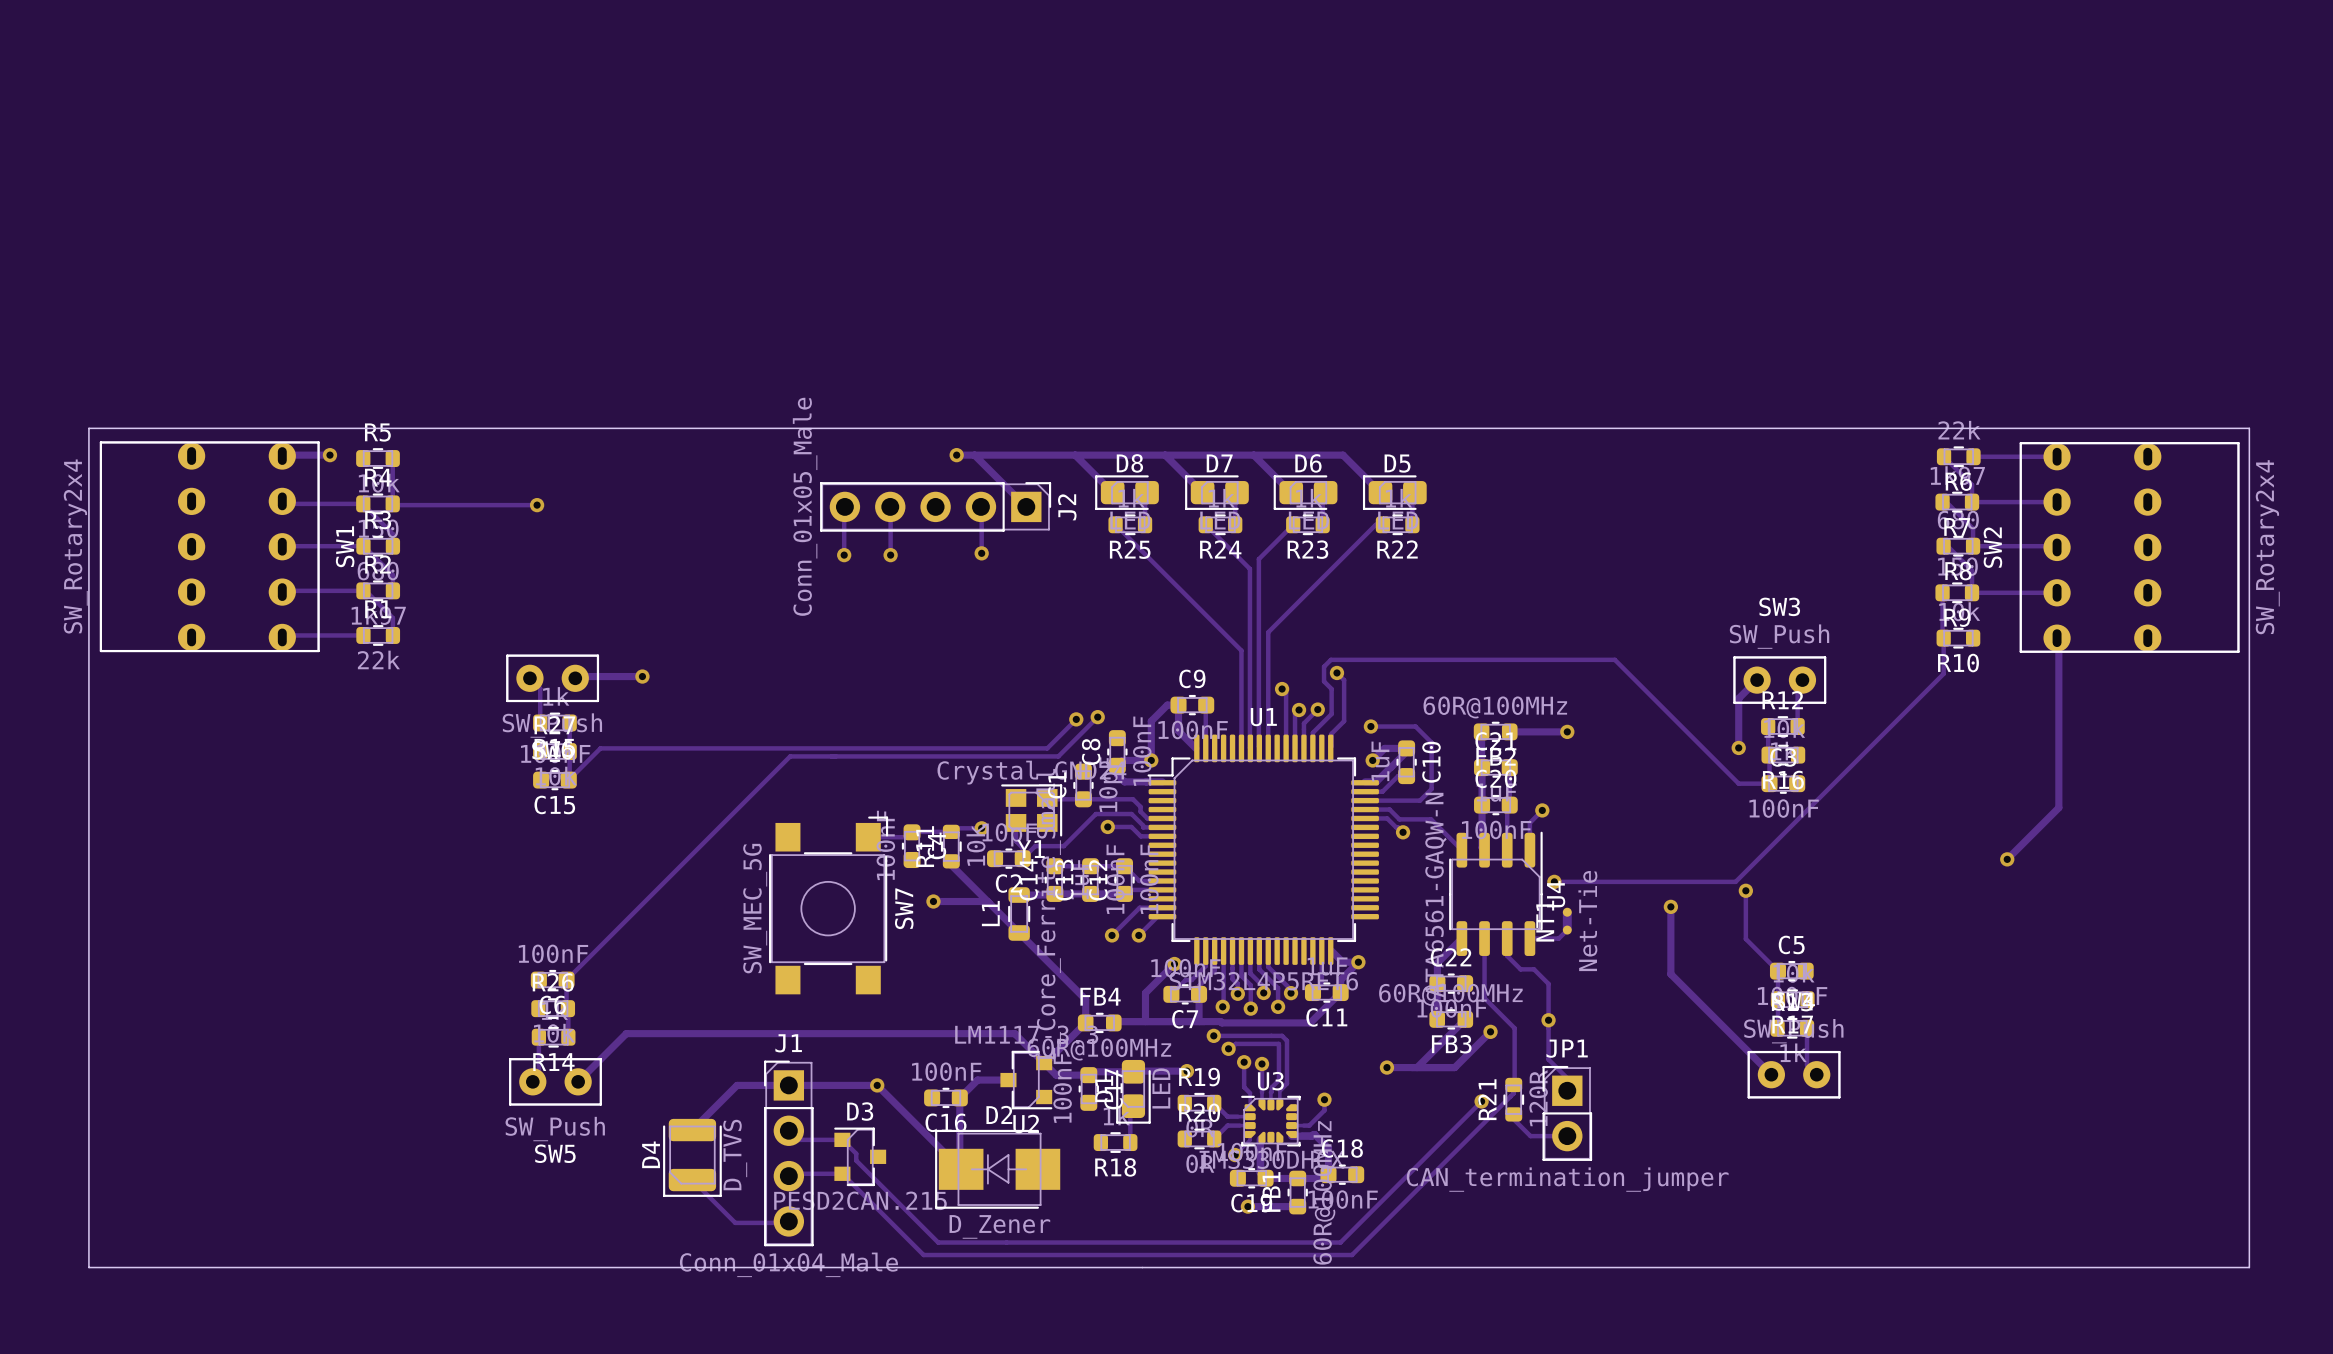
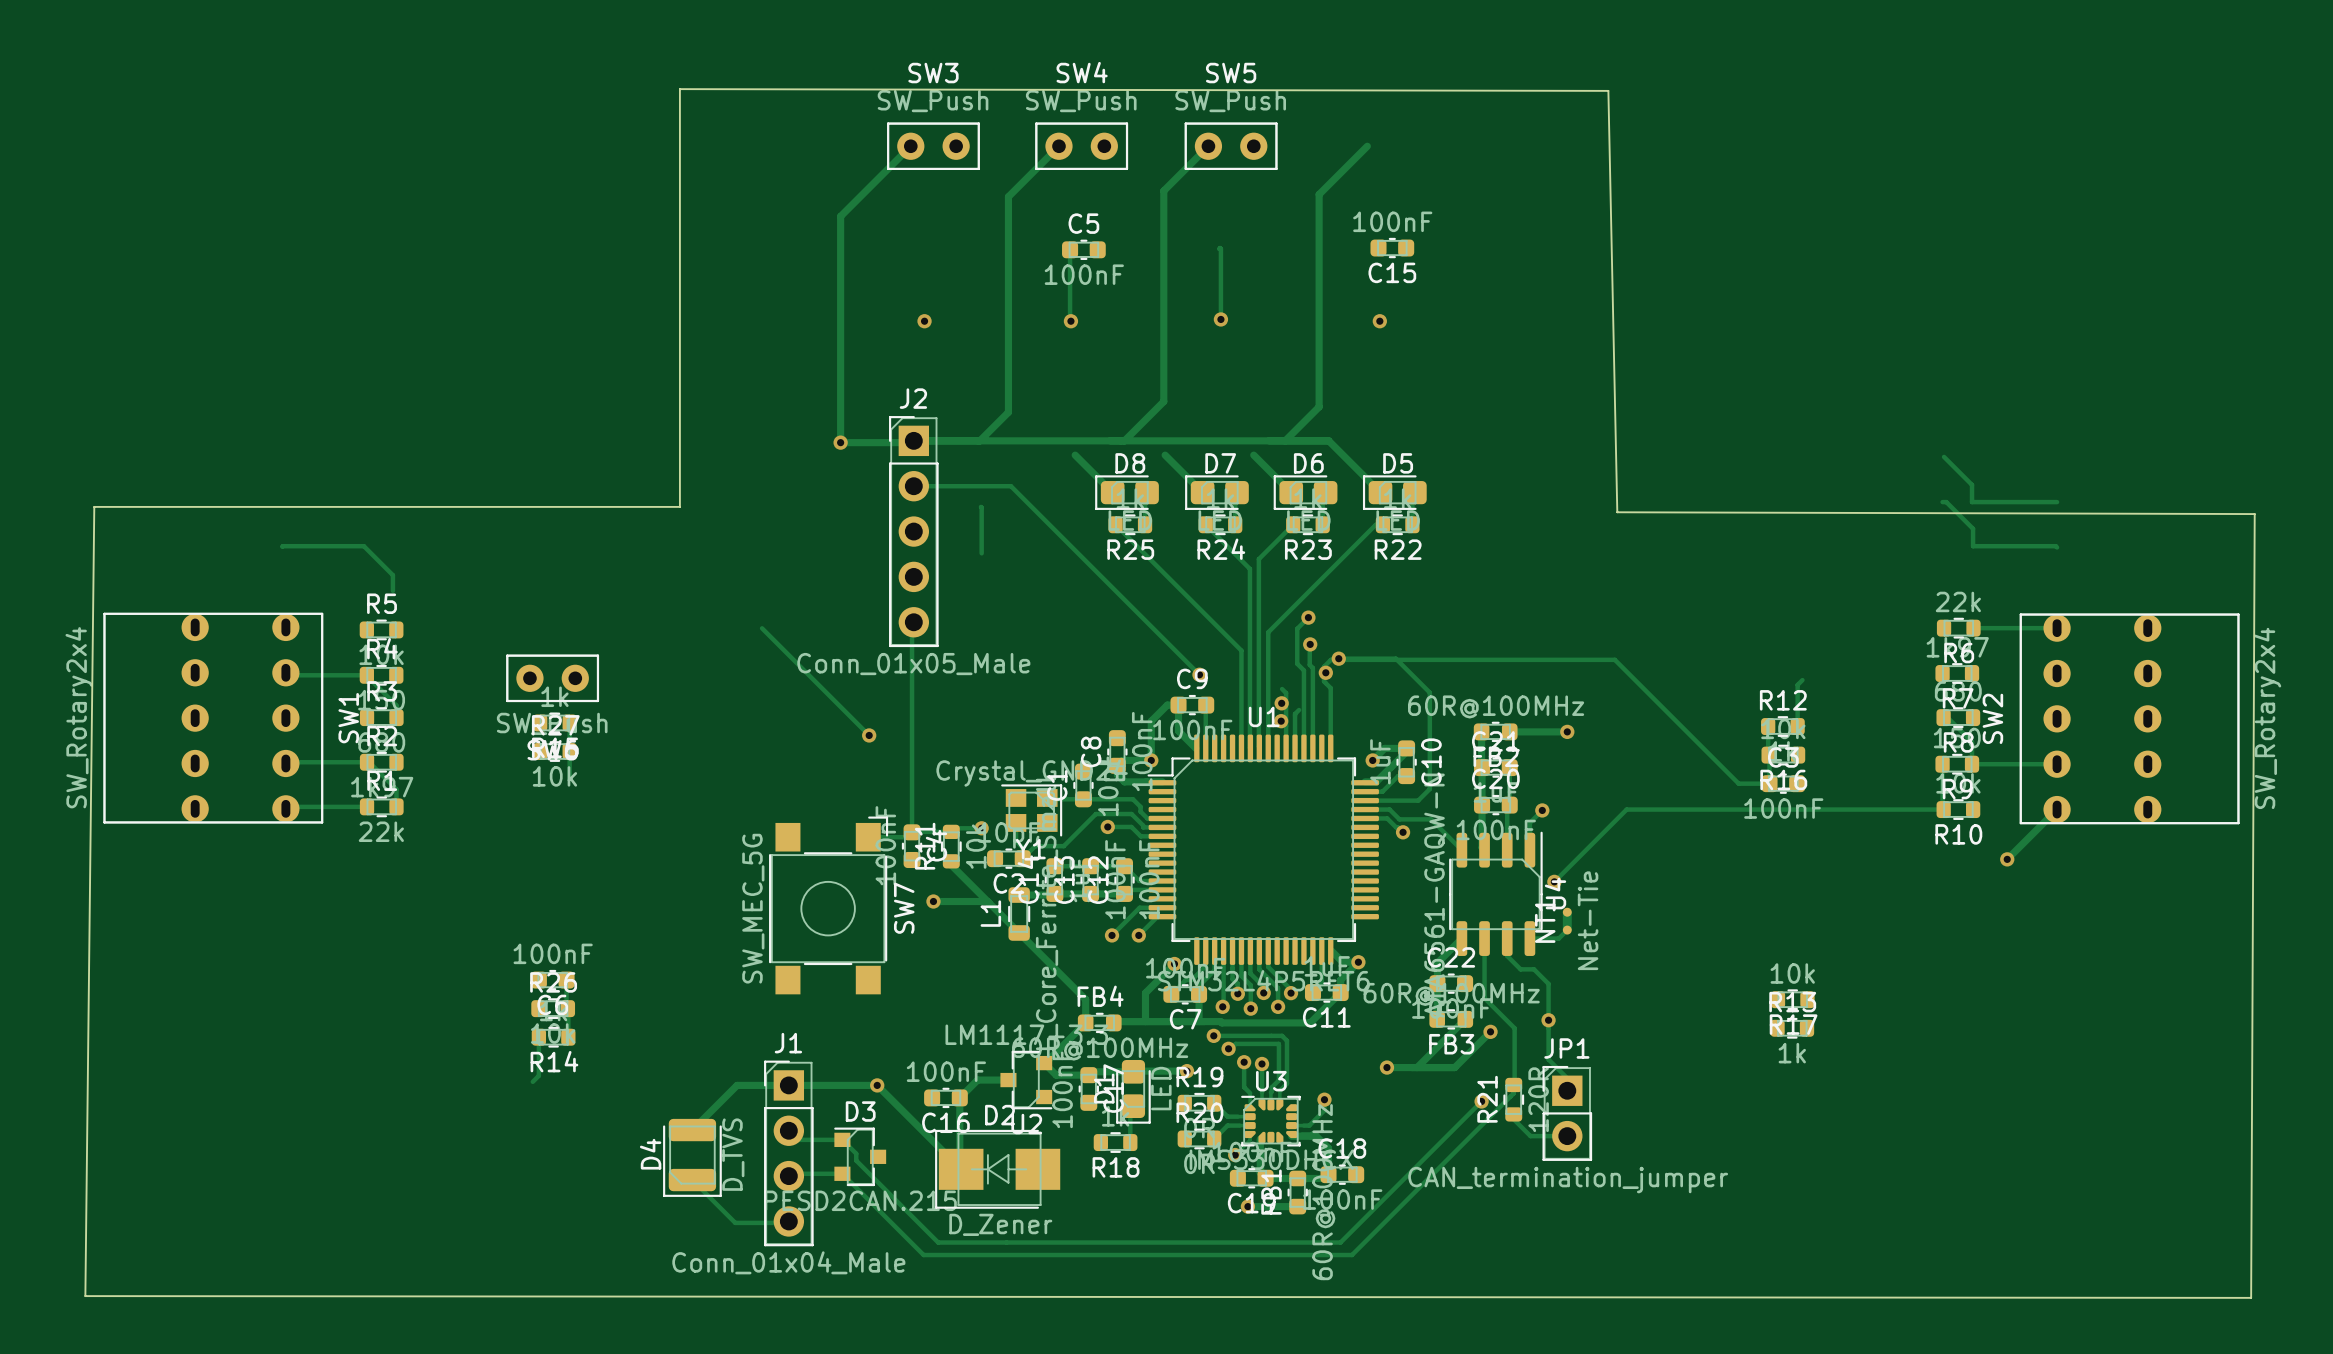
track: none -> (1058, 146) (1008, 196) (1008, 412) (979, 440)
track: none -> (1208, 146) (1163, 190) (1163, 401) (1124, 440)
track: none -> (1367, 146) (1319, 194) (1319, 406) (1285, 440)
track: none -> (1219, 248) (1220, 248) (1220, 319)
track: none -> (1069, 250) (1070, 321)
via: none -> (1220, 319)
via: none -> (924, 321)
via: none -> (1070, 321)
via: none -> (1379, 321)
board edge: (88, 428) (2249, 428) (2249, 1267) (88, 1267) (88, 428) -> (679, 89) (679, 506) (94, 506) (85, 1296) (2251, 1297) (2254, 514) (1617, 512) (1608, 90) (679, 89)
via: none -> (840, 442)
track: (329, 455) (282, 456) -> none
via: (329, 455) -> none
track: (956, 455) (1343, 455) -> (910, 146) (840, 216) (840, 442) (912, 442) (913, 440) (1328, 440) (1343, 455)
via: (956, 455) -> none
track: (974, 455) (1026, 506) -> none
track: (394, 456) (392, 458) (393, 505) (537, 505) -> none
R6 position: (1958, 456) -> (1958, 628)
track: (1973, 456) (2057, 456) -> (1973, 628) (2057, 628)
R5 position: (378, 458) -> (381, 629)
track: none -> (913, 486) (1010, 486) (1199, 674)
track: (282, 501) (284, 503) (363, 503) (392, 534) (392, 546) -> (285, 672) (288, 675) (366, 675) (396, 705) (396, 717)
R7 position: (1957, 502) -> (1957, 673)
R4 position: (378, 503) -> (381, 675)
via: (537, 505) -> none
track: (844, 506) (844, 555) -> none
track: (890, 506) (890, 555) -> none
J2 rotation: 0° (935, 506) -> 90° counterclockwise (913, 531)
SW1 position: (209, 546) -> (213, 718)
R3 position: (378, 546) -> (381, 717)
track: (1943, 546) (1947, 546) (1972, 570) (1972, 592) (2057, 592) -> (1943, 717) (1947, 717) (1972, 742) (1972, 764) (2057, 764)
R8 position: (1958, 546) -> (1958, 717)
SW2 position: (2129, 547) -> (2129, 718)
via: (981, 553) -> none
via: (844, 555) -> none
via: (890, 555) -> none
R2 position: (378, 590) -> (381, 762)
track: (282, 592) (365, 590) (392, 618) (392, 635) -> (285, 763) (369, 762) (396, 789) (396, 806)
track: (1942, 592) (1943, 673) (1735, 881) (1554, 881) -> (1942, 764) (1943, 809) (1626, 809) (1554, 881)
R9 position: (1957, 592) -> (1957, 764)
via: none -> (1308, 617)
track: none -> (913, 622) (912, 624) (912, 832)
track: none -> (762, 628) (869, 735)
track: (363, 635) (284, 635) (282, 637) -> (367, 806) (287, 806) (285, 808)
R1 position: (378, 635) -> (381, 806)
R10 position: (1958, 638) -> (1958, 809)
track: (2057, 638) (2058, 639) (2058, 807) (2057, 809) -> none
via: none -> (1310, 644)
via: none -> (1338, 658)
via: none -> (1325, 672)
track: (1336, 672) (1344, 680) (1344, 721) (1331, 733) (1330, 747) -> (1330, 688) (1330, 747)
via: (1336, 672) -> none
via: none -> (1199, 674)
track: (642, 676) (577, 676) (575, 678) -> none
via: (642, 676) -> none
track: (529, 678) (540, 688) (540, 722) -> none
track: (1757, 680) (1738, 698) (1738, 747) -> none
SW3 position: (1779, 680) -> (933, 146)
track: (1330, 688) (1331, 714) (1312, 732) -> (1310, 644) (1309, 664) (1312, 668) (1312, 732)
via: (1282, 689) -> none
via: none -> (1281, 703)
track: (1317, 709) (1303, 723) -> (1308, 617) (1297, 628) (1297, 663) (1303, 670) (1303, 723)
via: (1317, 709) -> none
via: (1299, 710) -> none
track: (1097, 717) (1058, 756) (790, 756) (565, 979) -> none
via: (1097, 717) -> none
track: (1076, 719) (1047, 748) (600, 748) (568, 780) -> none
via: (1076, 719) -> none
via: none -> (1281, 721)
track: (1370, 726) (1415, 726) (1431, 742) (1431, 789) (1418, 800) -> (1338, 658) (1395, 658) (1429, 692) (1429, 789) (1418, 800)
via: (1370, 726) -> none
via: none -> (869, 735)
via: (1738, 747) -> none
C15 position: (554, 780) -> (1392, 248)
track: (1745, 890) (1745, 939) (1777, 971) (1777, 1028) -> none
via: (1745, 890) -> none
track: (1670, 906) (1670, 974) (1771, 1074) -> none
via: (1670, 906) -> none
C5 position: (1791, 971) -> (1083, 249)
track: (1807, 1028) (1807, 1064) (1816, 1074) -> none
track: (1044, 1063) (1014, 1033) (626, 1033) (578, 1081) -> none
SW4 position: (1794, 1074) -> (1081, 146)
SW5 position: (555, 1081) -> (1231, 146)
SW5 value position: SW_Push (555, 1129) -> SW_Push (1230, 101)
SW5 name position: SW5 (555, 1153) -> SW5 (1231, 73)

